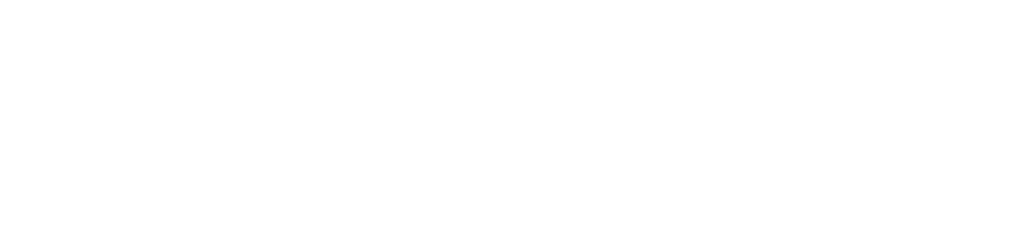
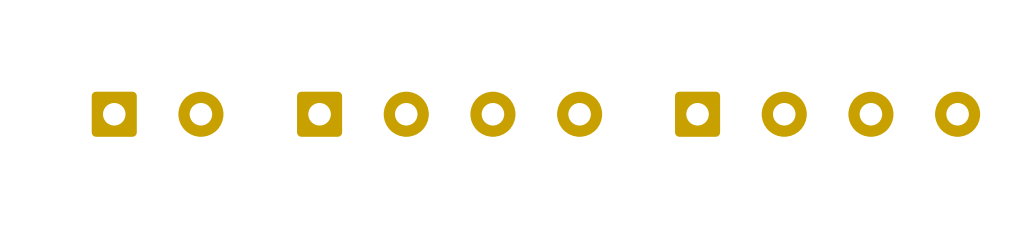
part: none -> (157, 114)
part: none -> (449, 114)
part: none -> (827, 114)

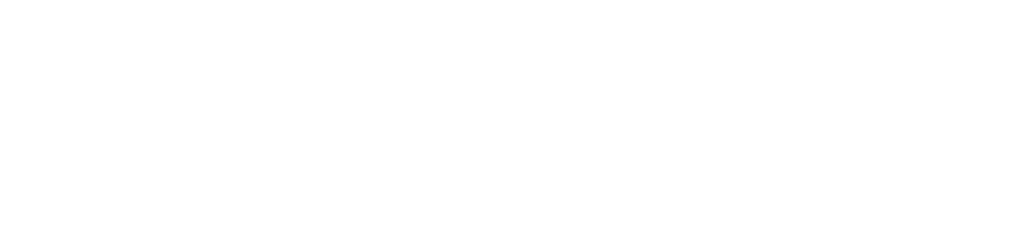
part: (157, 114) -> none
part: (449, 114) -> none
part: (827, 114) -> none

